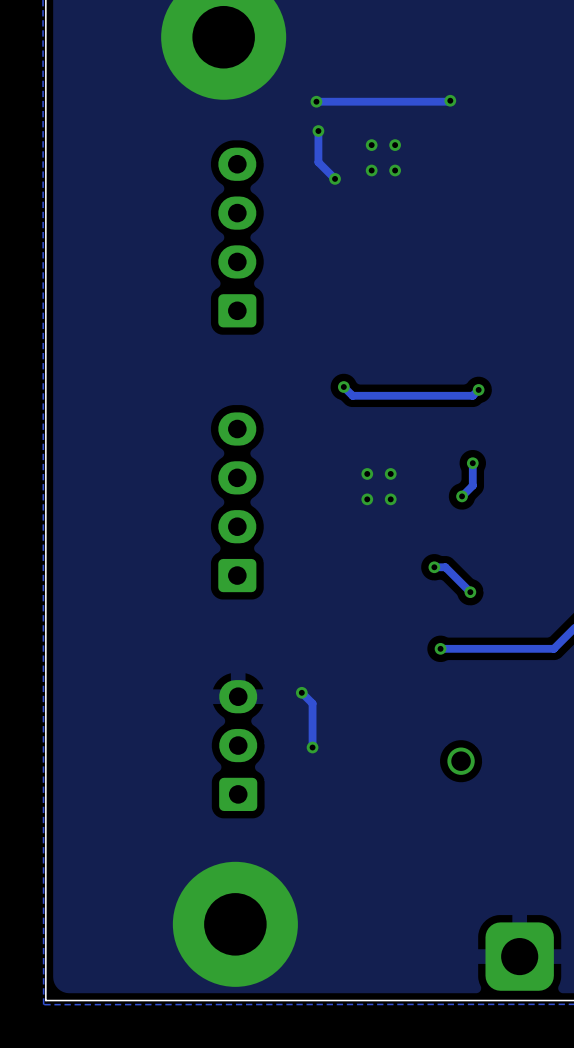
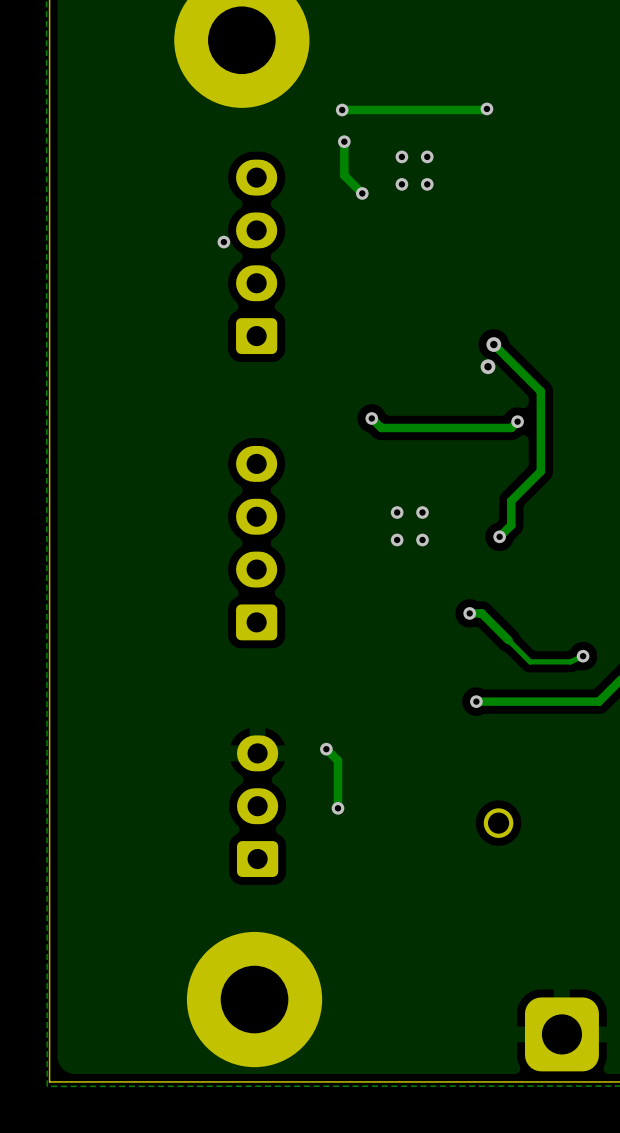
via: none -> (223, 242)
track: none -> (493, 344) (540, 391) (540, 471) (511, 500)
via: none -> (493, 344)
via: none -> (488, 366)
via: (472, 463) -> none
track: none -> (508, 640) (530, 661) (570, 661) (583, 656)
via position: (470, 592) -> (583, 656)

